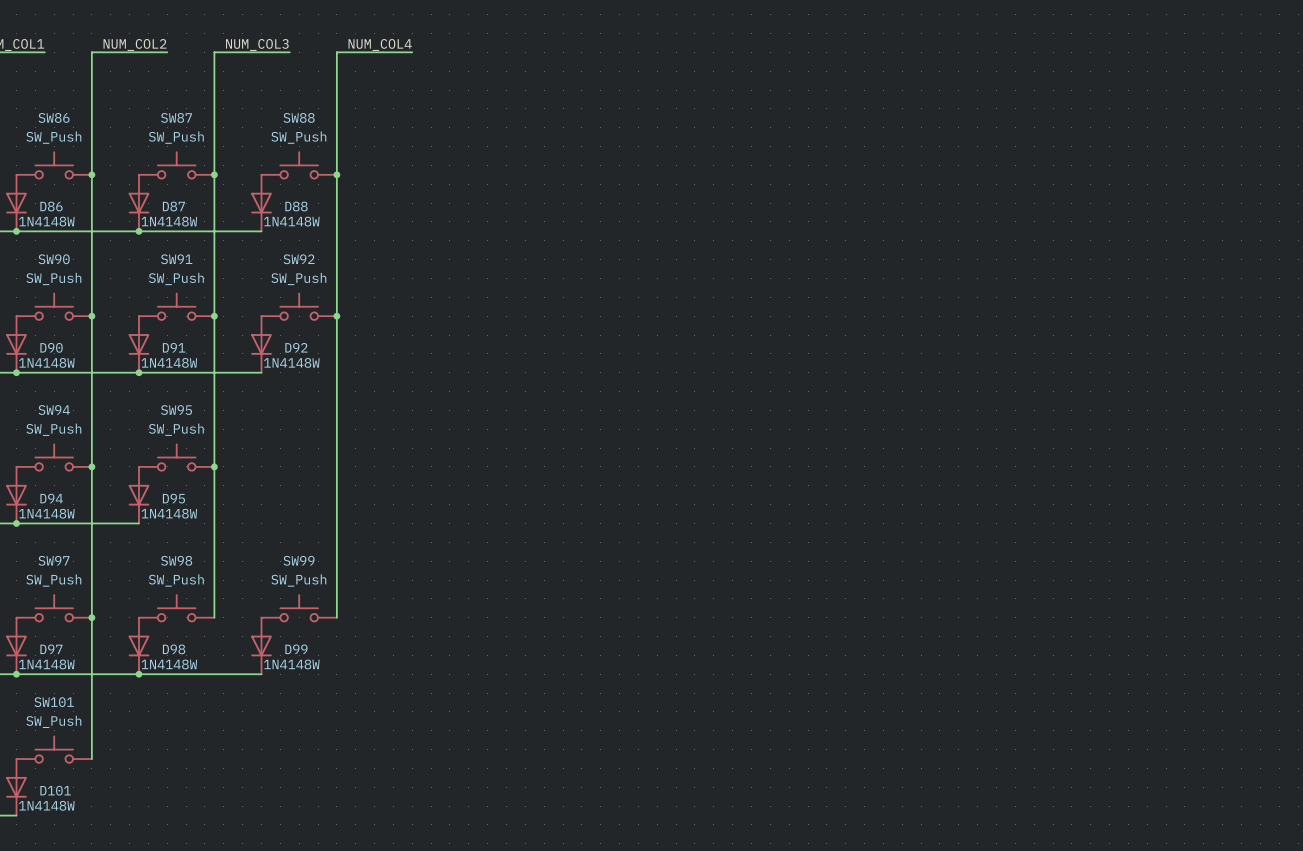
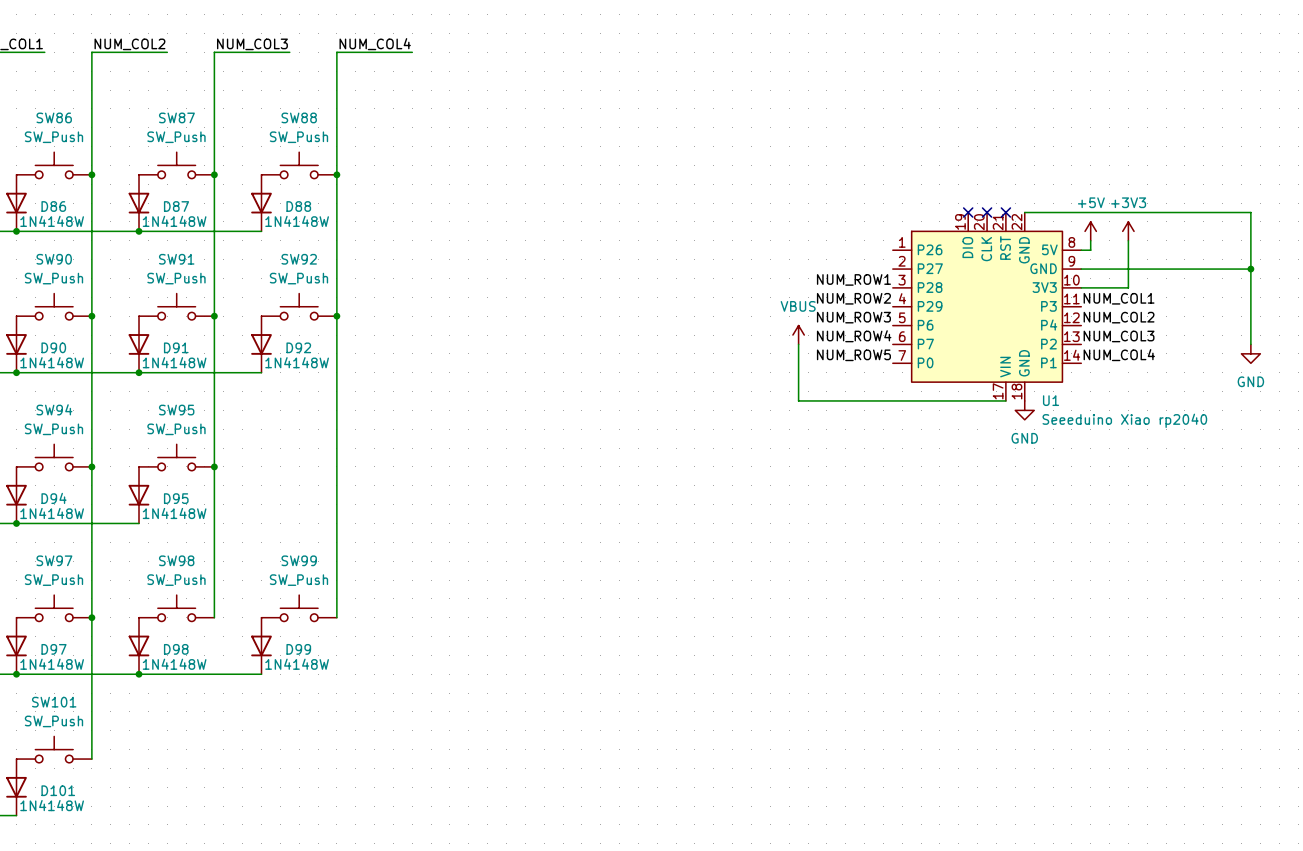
no-connect mark: none -> (968, 212)
no-connect mark: none -> (987, 212)
no-connect mark: none -> (1005, 212)
wire: none -> (1024, 212) (1250, 212) (1250, 344)
power symbol: none -> +5V (1090, 231)
power symbol: none -> +3V3 (1128, 231)
wire: none -> (1090, 240) (1090, 250) (1081, 250)
wire: none -> (1128, 240) (1128, 287) (1081, 287)
wire: none -> (1081, 269) (1250, 269)
junction: none -> (1250, 269)
label: none -> NUM_ROW1 (853, 279)
label: none -> NUM_ROW2 (853, 298)
label: none -> NUM_COL1 (1119, 298)
U1: none -> Seeeduino Xiao rp2040 (987, 306)
label: none -> NUM_ROW3 (853, 317)
label: none -> NUM_COL2 (1119, 317)
power symbol: none -> VBUS (798, 335)
label: none -> NUM_ROW4 (854, 336)
label: none -> NUM_COL3 (1119, 336)
wire: none -> (798, 344) (798, 400) (1005, 400)
power symbol: none -> GND (1250, 353)
label: none -> NUM_ROW5 (853, 355)
label: none -> NUM_COL4 (1119, 355)
power symbol: none -> GND (1024, 410)

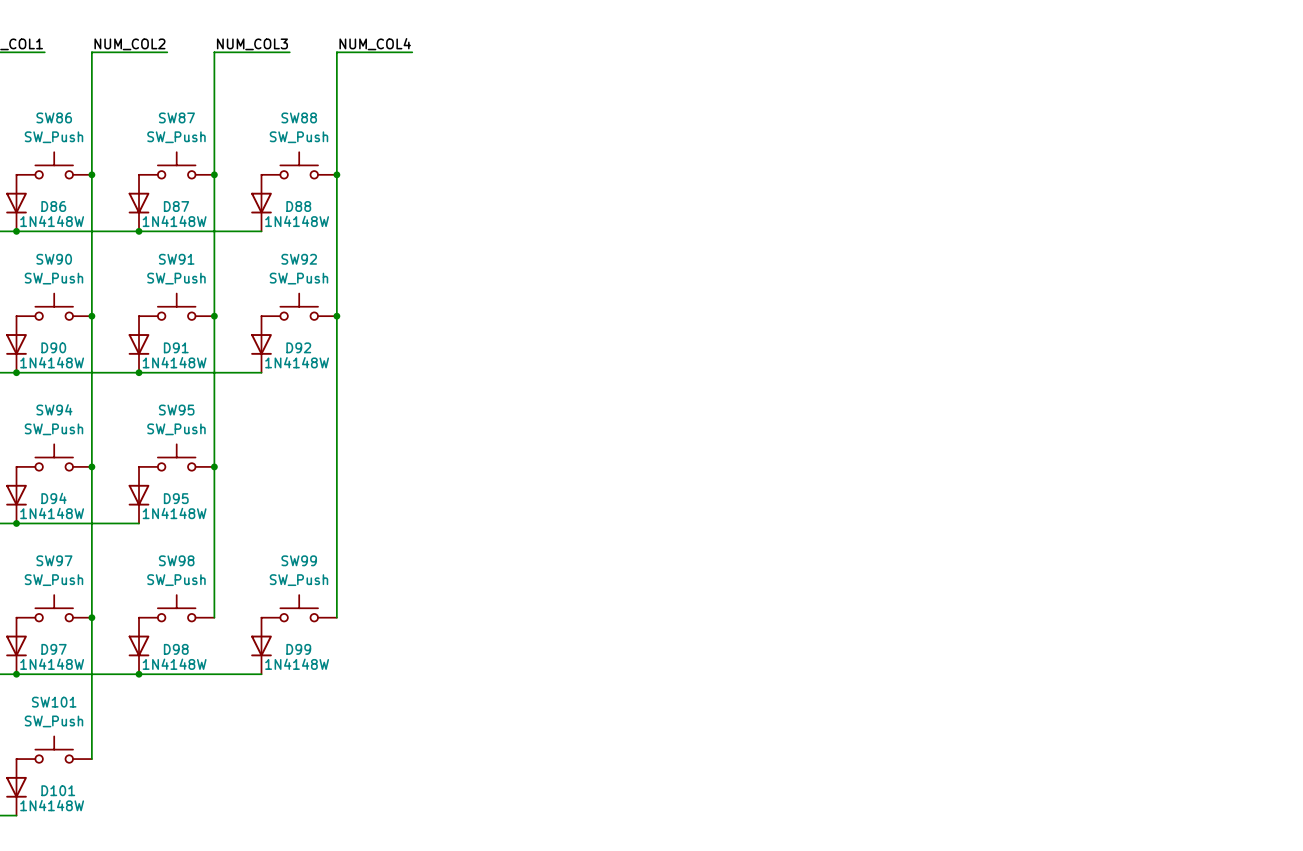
no-connect mark: (968, 212) -> none
no-connect mark: (987, 212) -> none
no-connect mark: (1005, 212) -> none
wire: (1024, 212) (1250, 212) (1250, 344) -> none
power symbol: +5V (1090, 231) -> none
power symbol: +3V3 (1128, 231) -> none
wire: (1090, 240) (1090, 250) (1081, 250) -> none
wire: (1128, 240) (1128, 287) (1081, 287) -> none
wire: (1081, 269) (1250, 269) -> none
junction: (1250, 269) -> none
label: NUM_ROW1 (853, 279) -> none
label: NUM_ROW2 (853, 298) -> none
label: NUM_COL1 (1119, 298) -> none
U1: Seeeduino Xiao rp2040 (987, 306) -> none
label: NUM_ROW3 (853, 317) -> none
label: NUM_COL2 (1119, 317) -> none
power symbol: VBUS (798, 335) -> none
label: NUM_ROW4 (854, 336) -> none
label: NUM_COL3 (1119, 336) -> none
wire: (798, 344) (798, 400) (1005, 400) -> none
power symbol: GND (1250, 353) -> none
label: NUM_ROW5 (853, 355) -> none
label: NUM_COL4 (1119, 355) -> none
power symbol: GND (1024, 410) -> none

